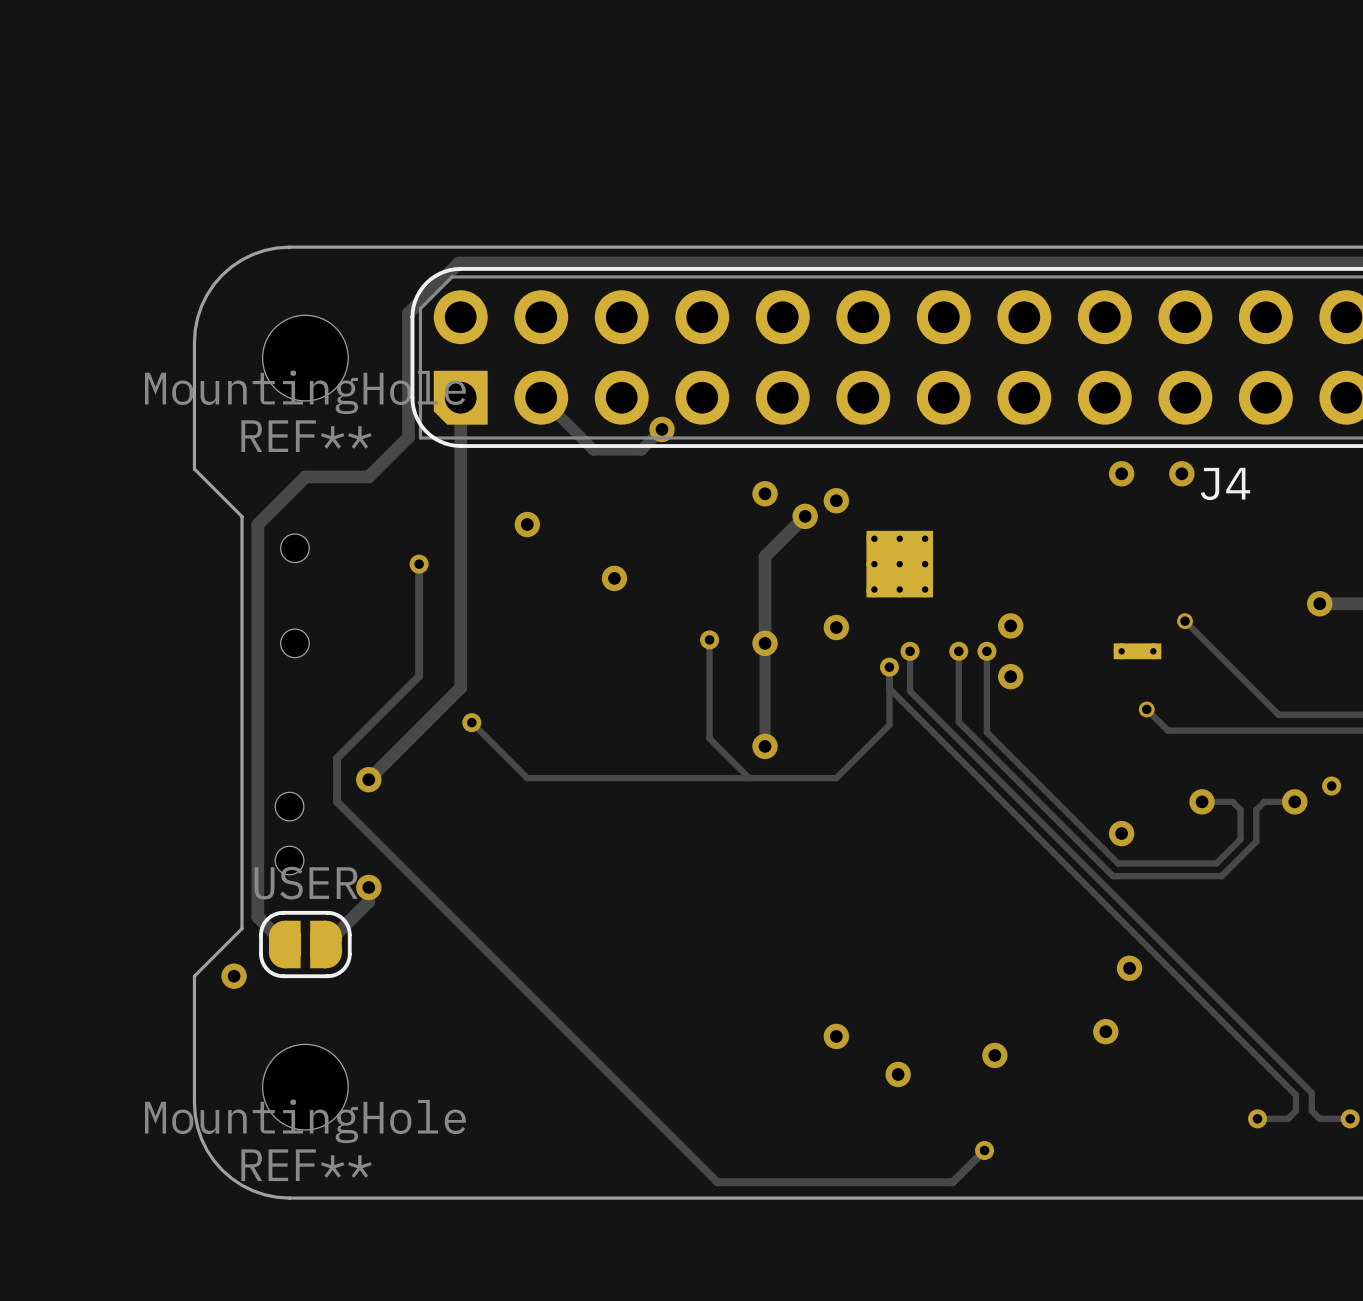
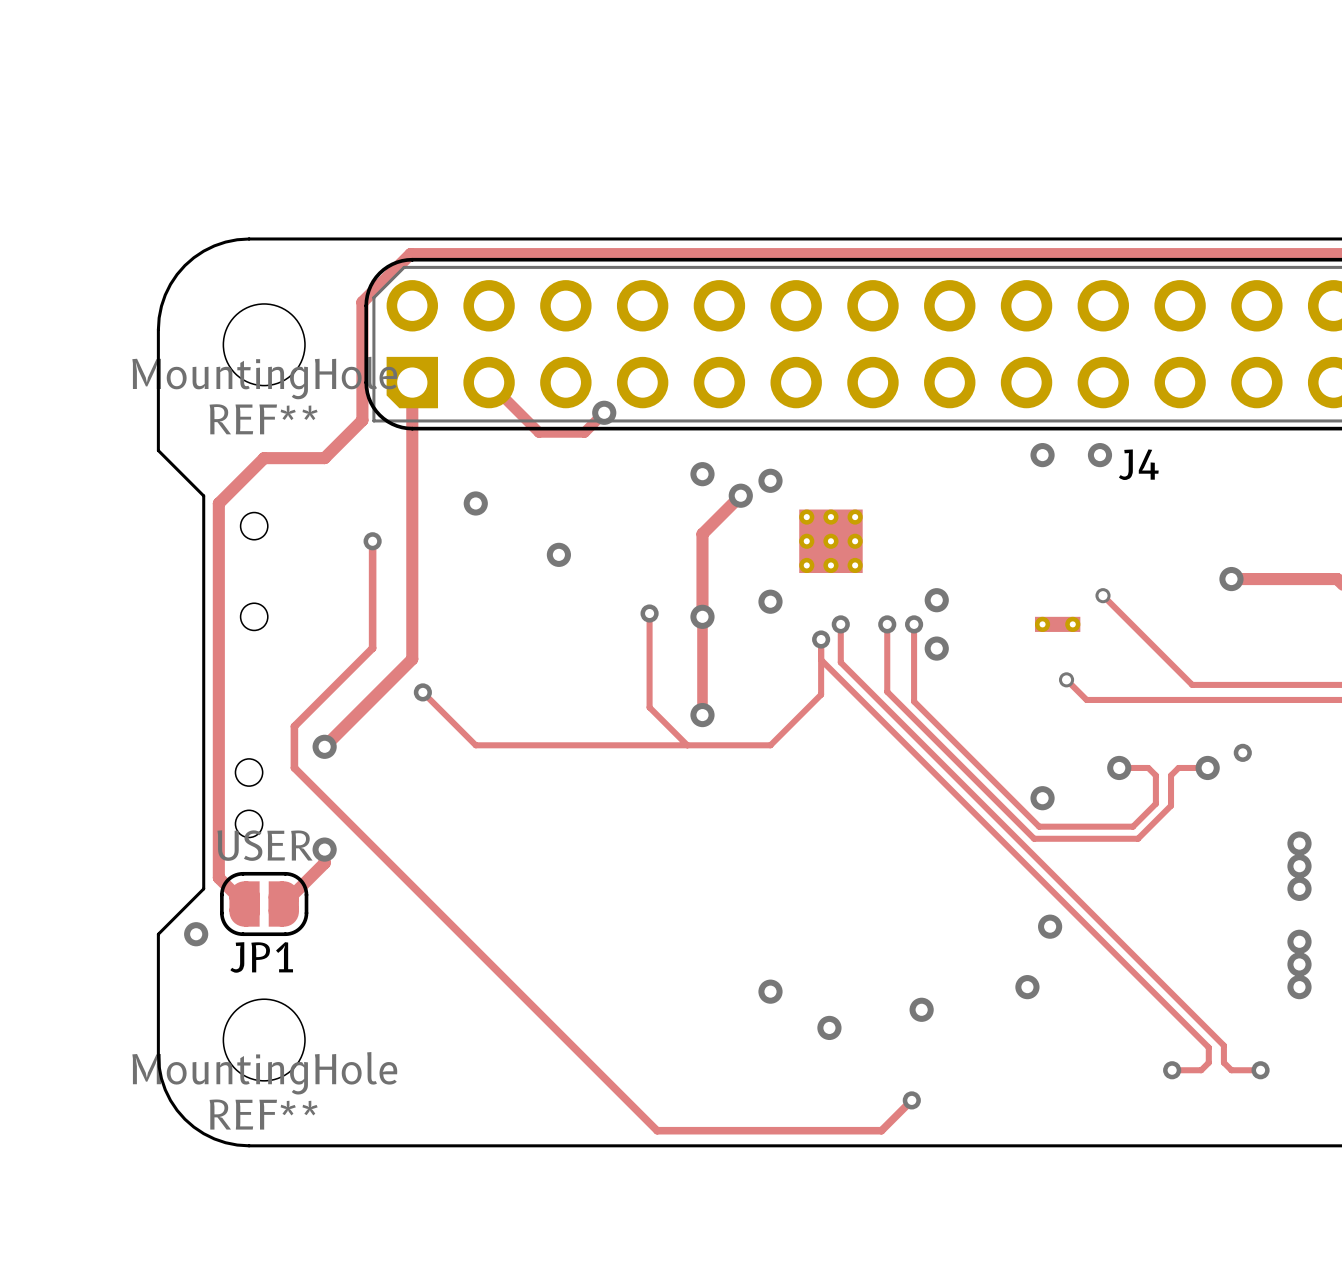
JP1 name: none -> JP1 (261, 957)

